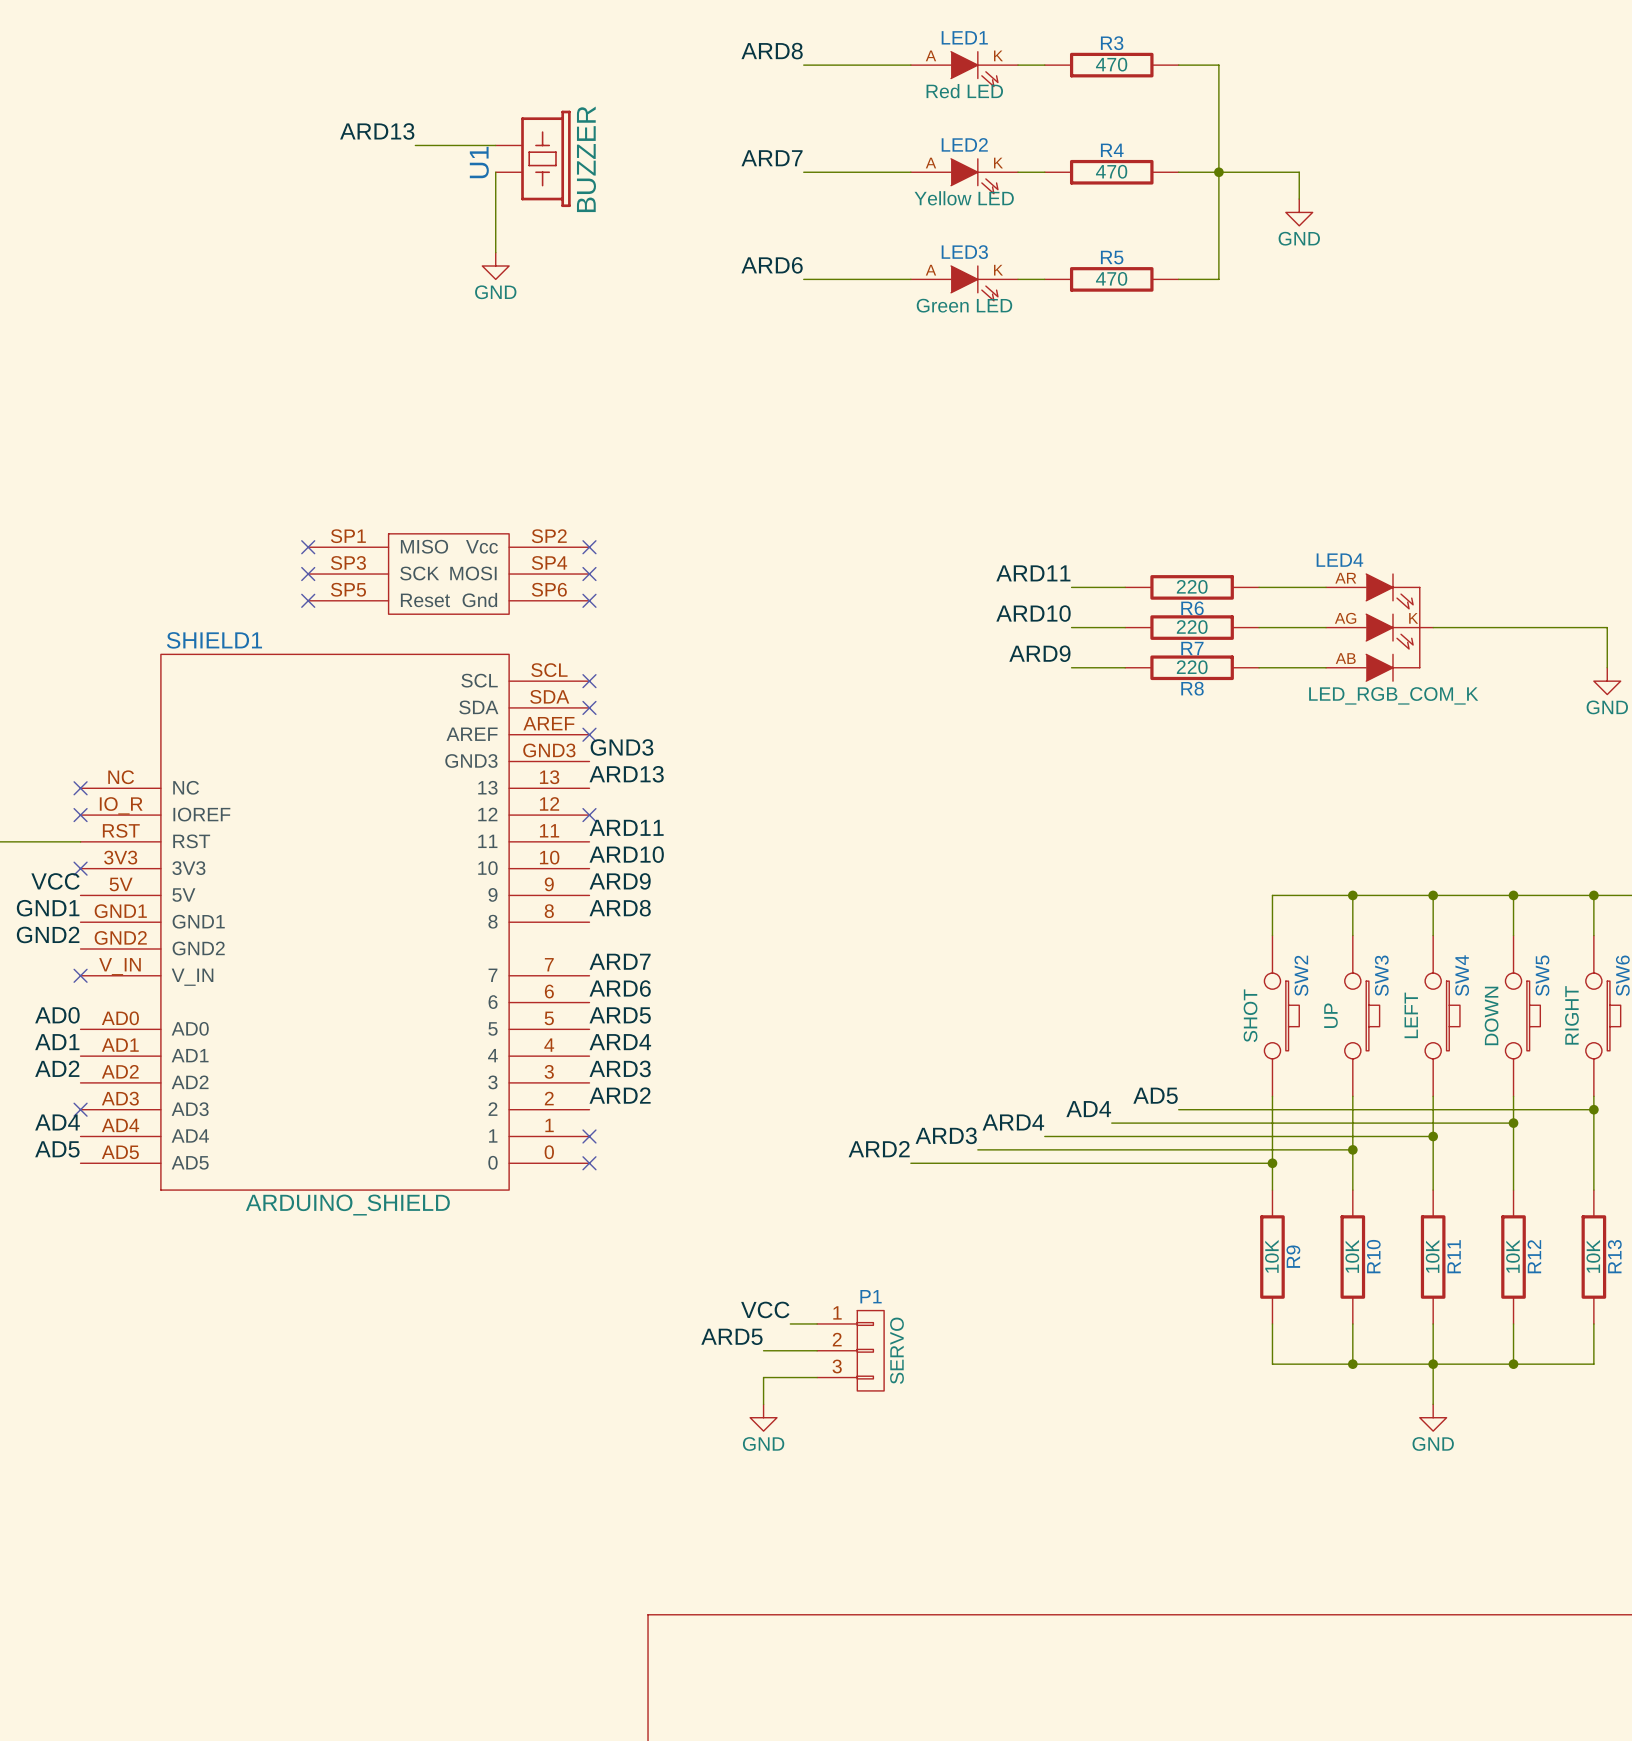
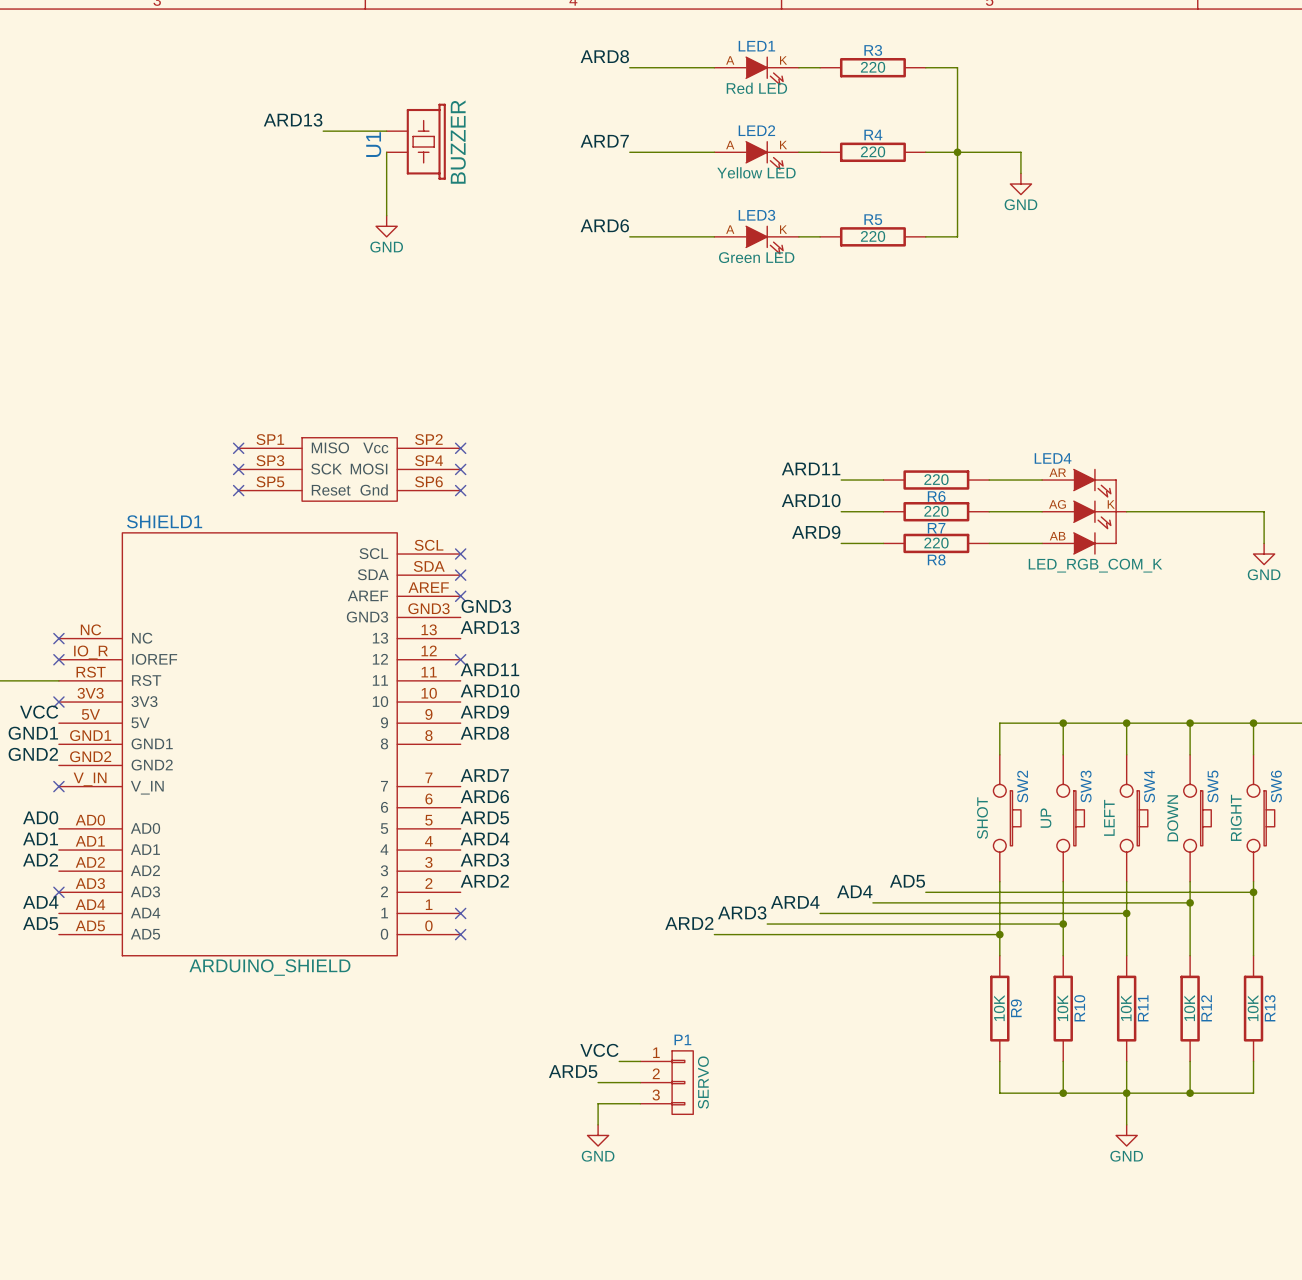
R3 value: 470 (1111, 64) -> 220 (873, 67)
R4 value: 470 (1111, 171) -> 220 (873, 151)
R5 value: 470 (1111, 278) -> 220 (873, 236)

